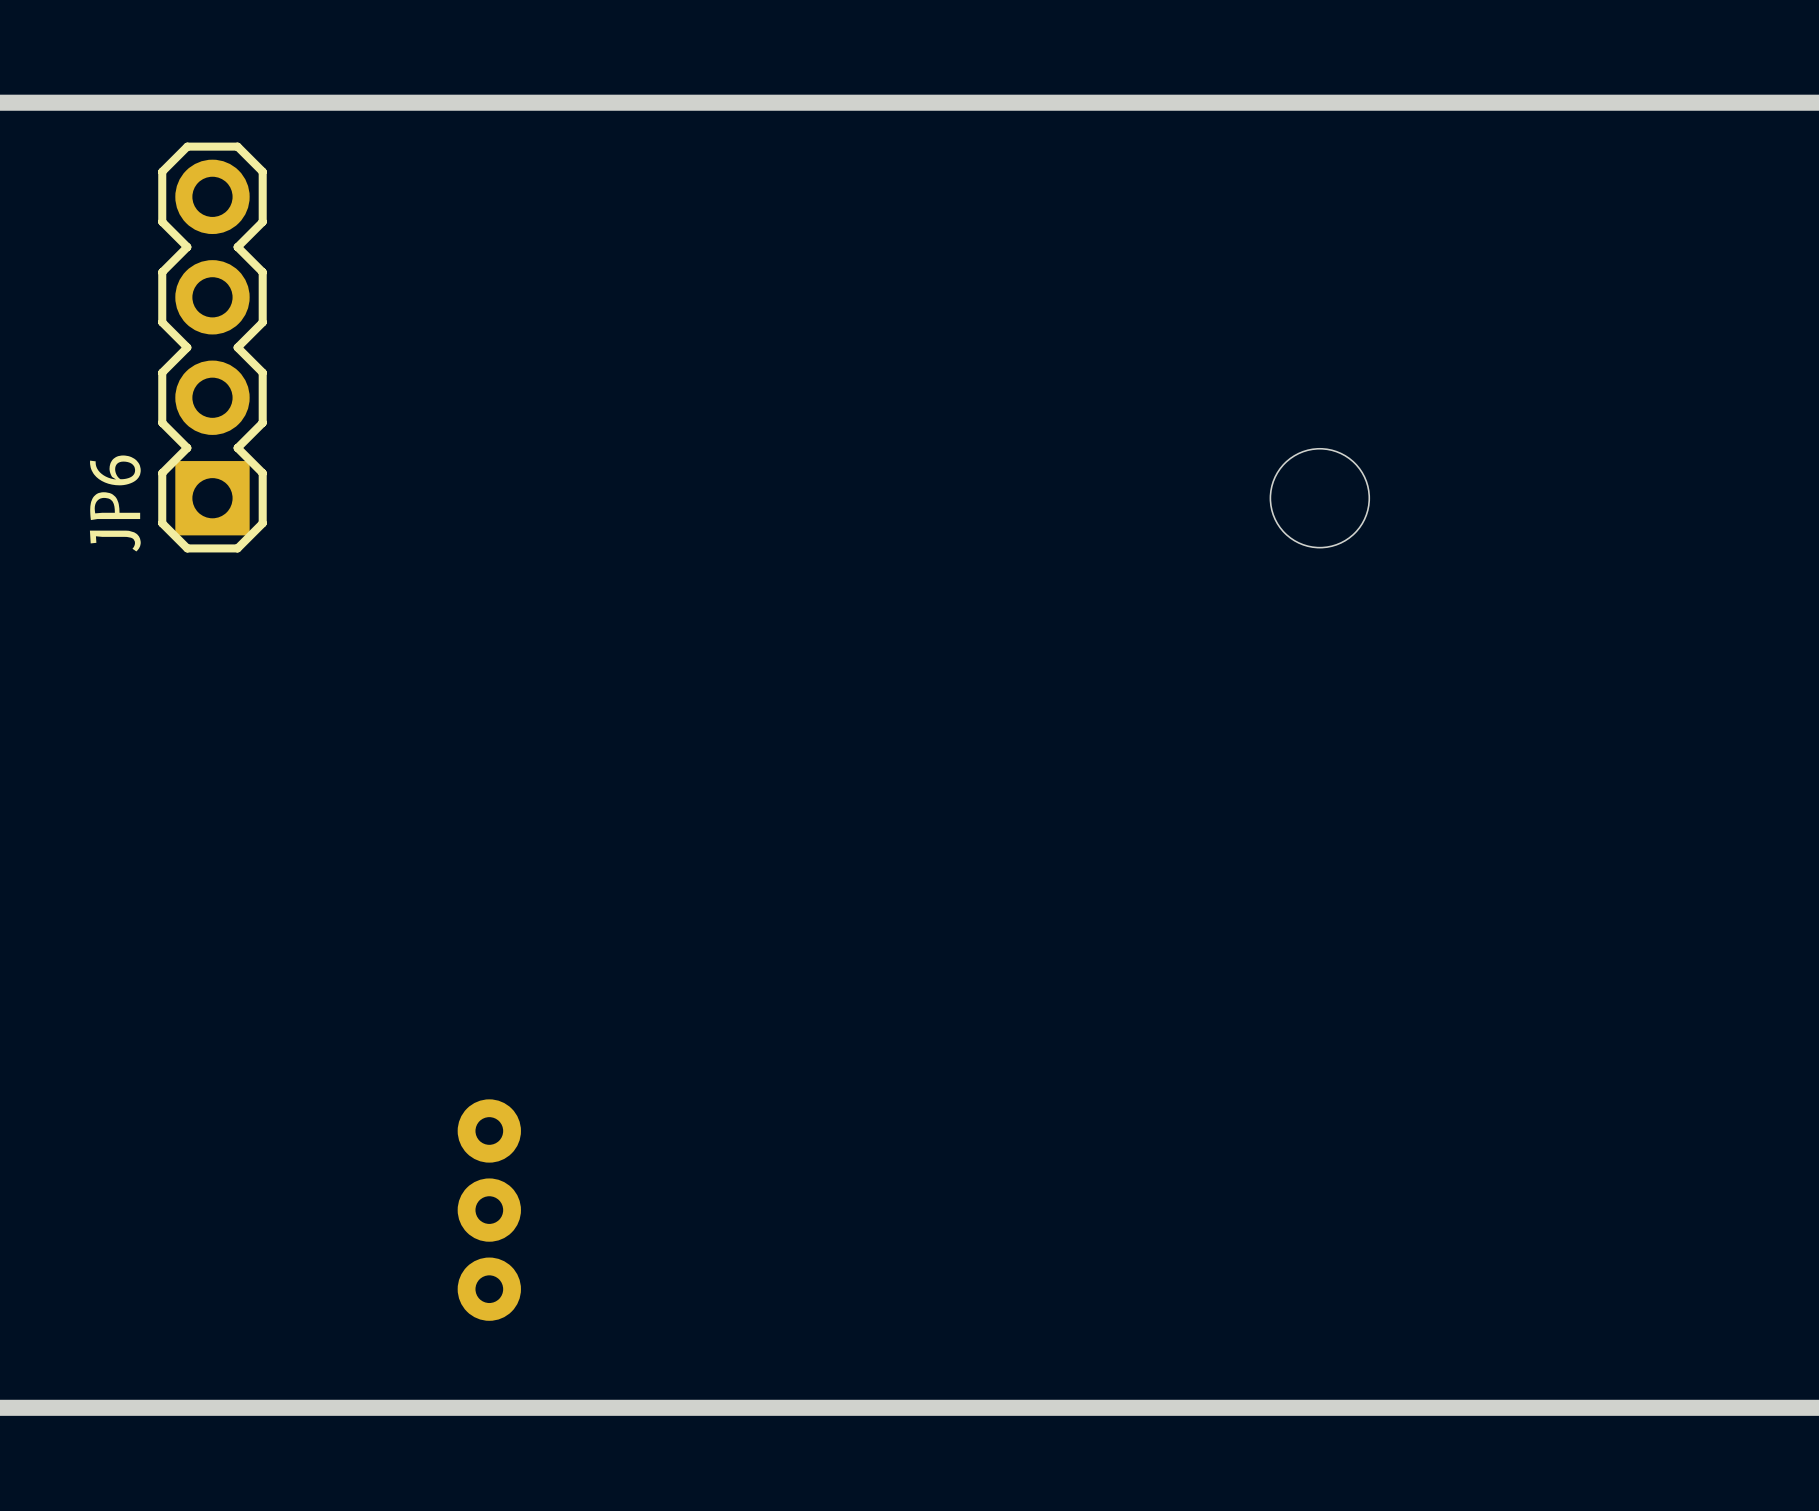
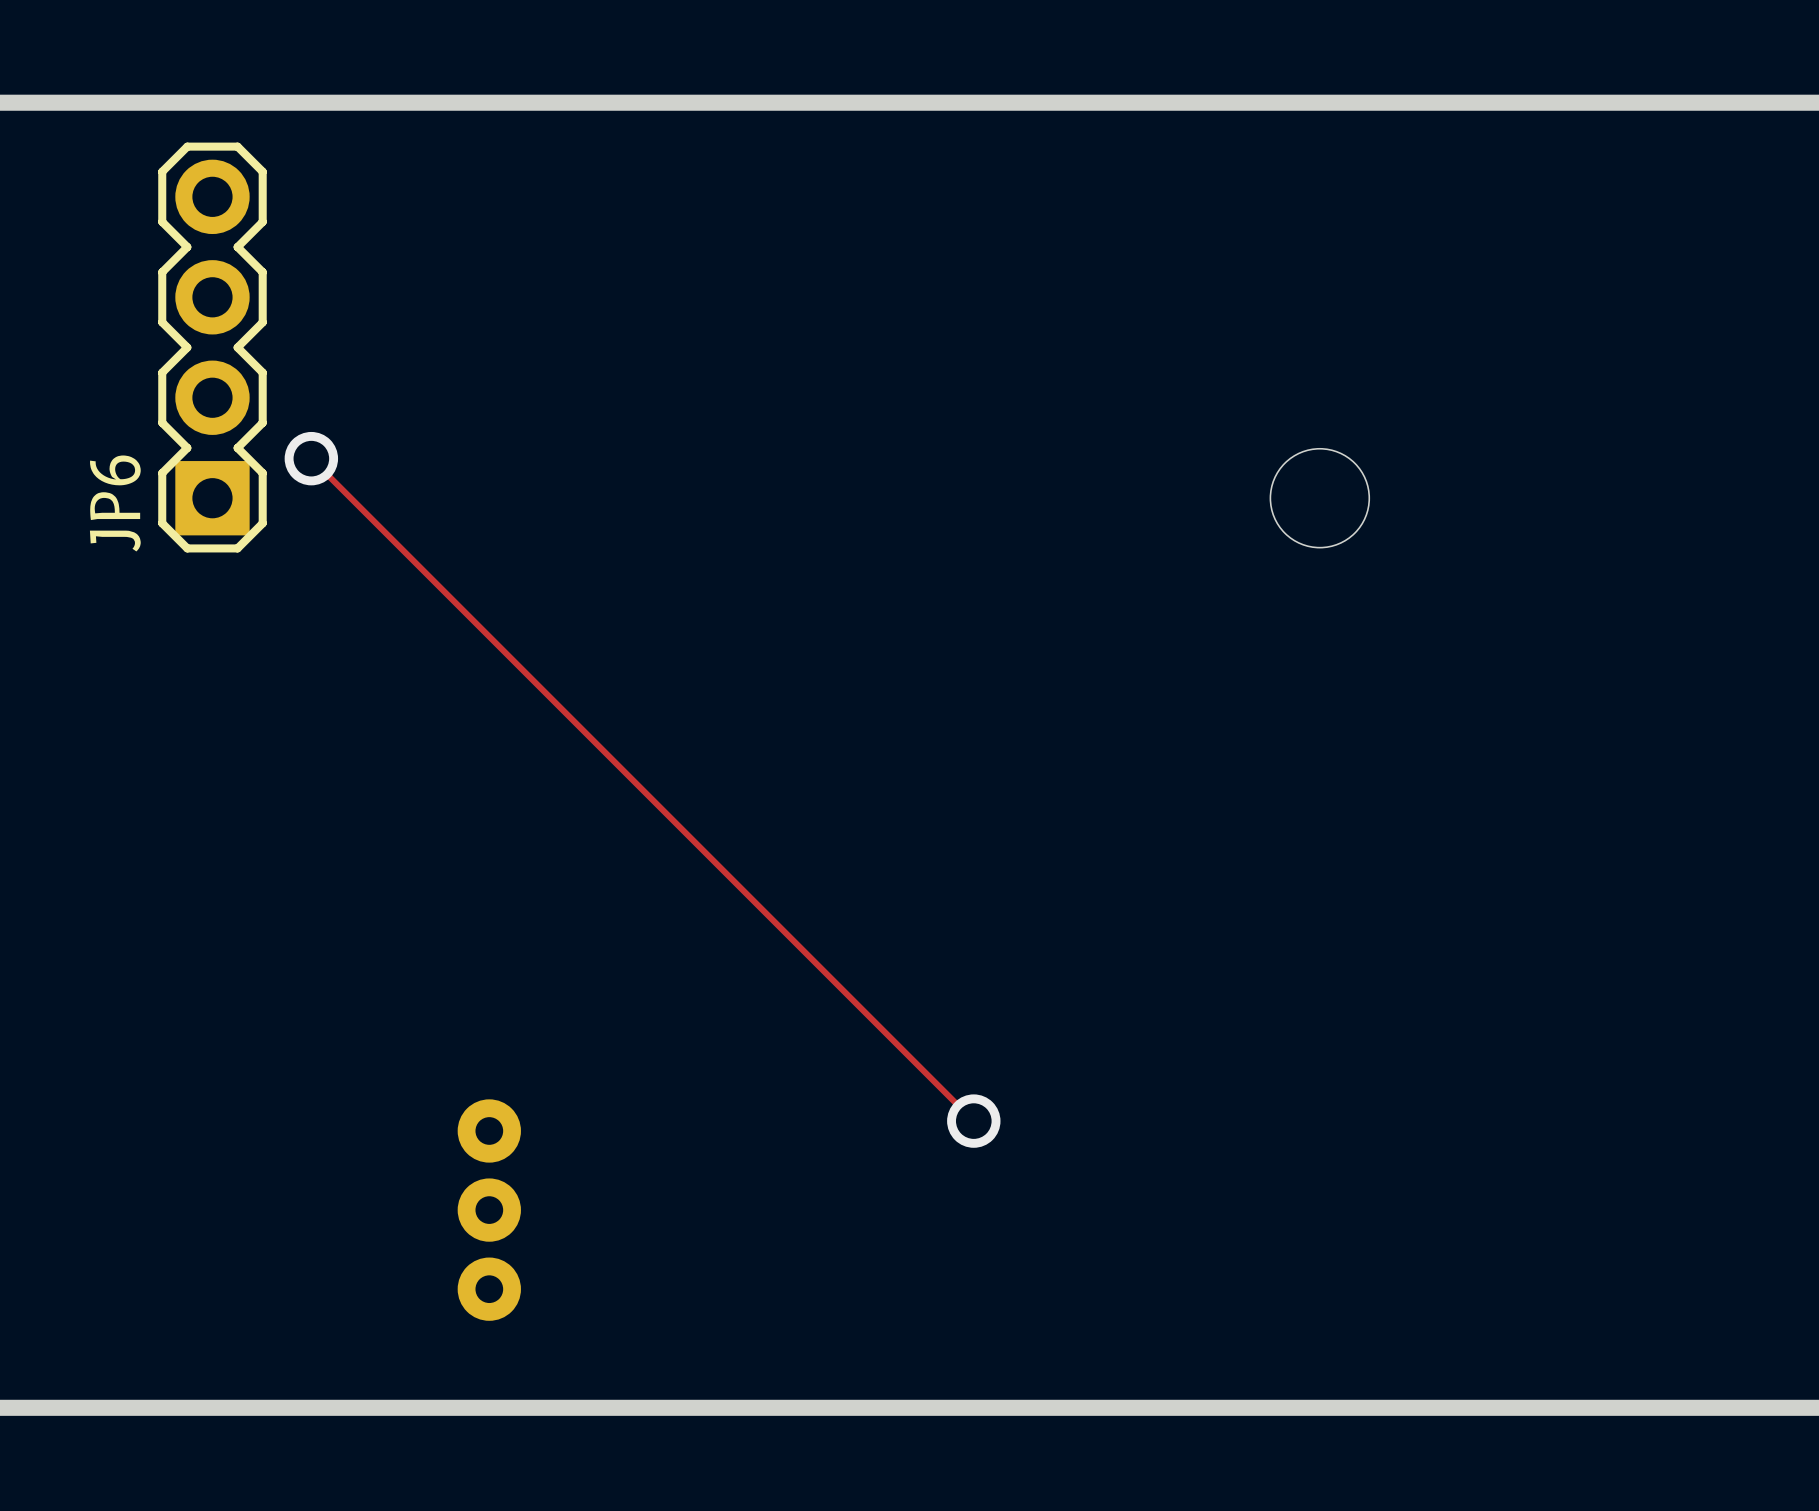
track: none -> (311, 458) (973, 1121)
via: none -> (311, 458)
via: none -> (973, 1121)

